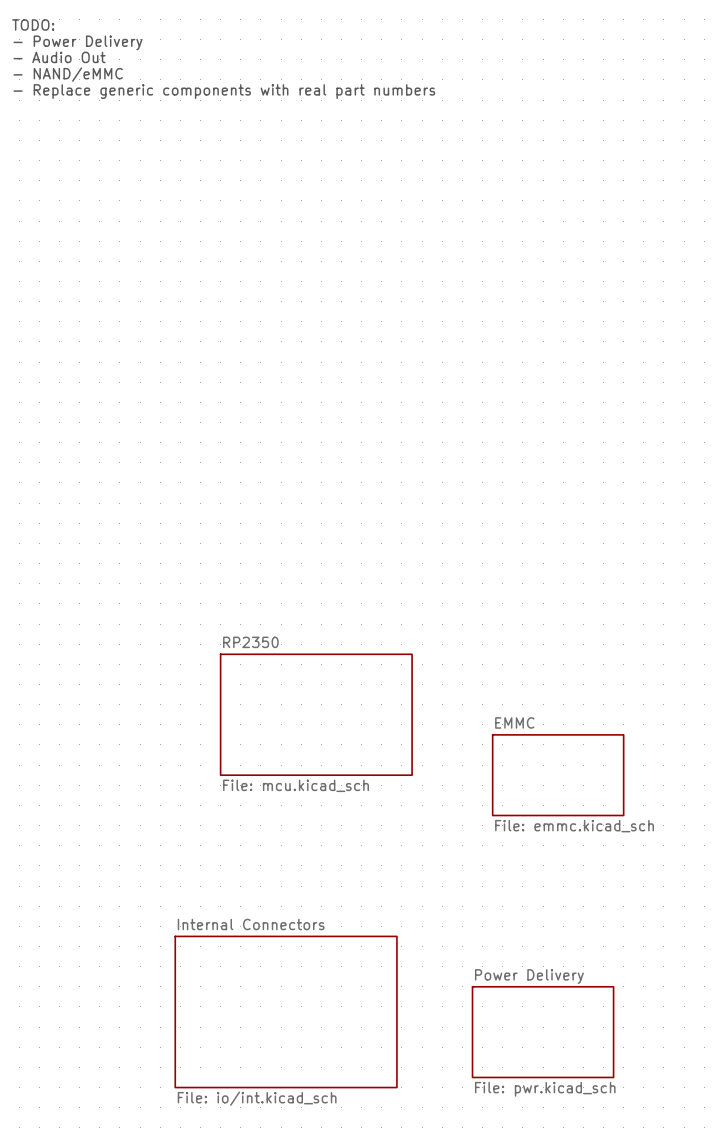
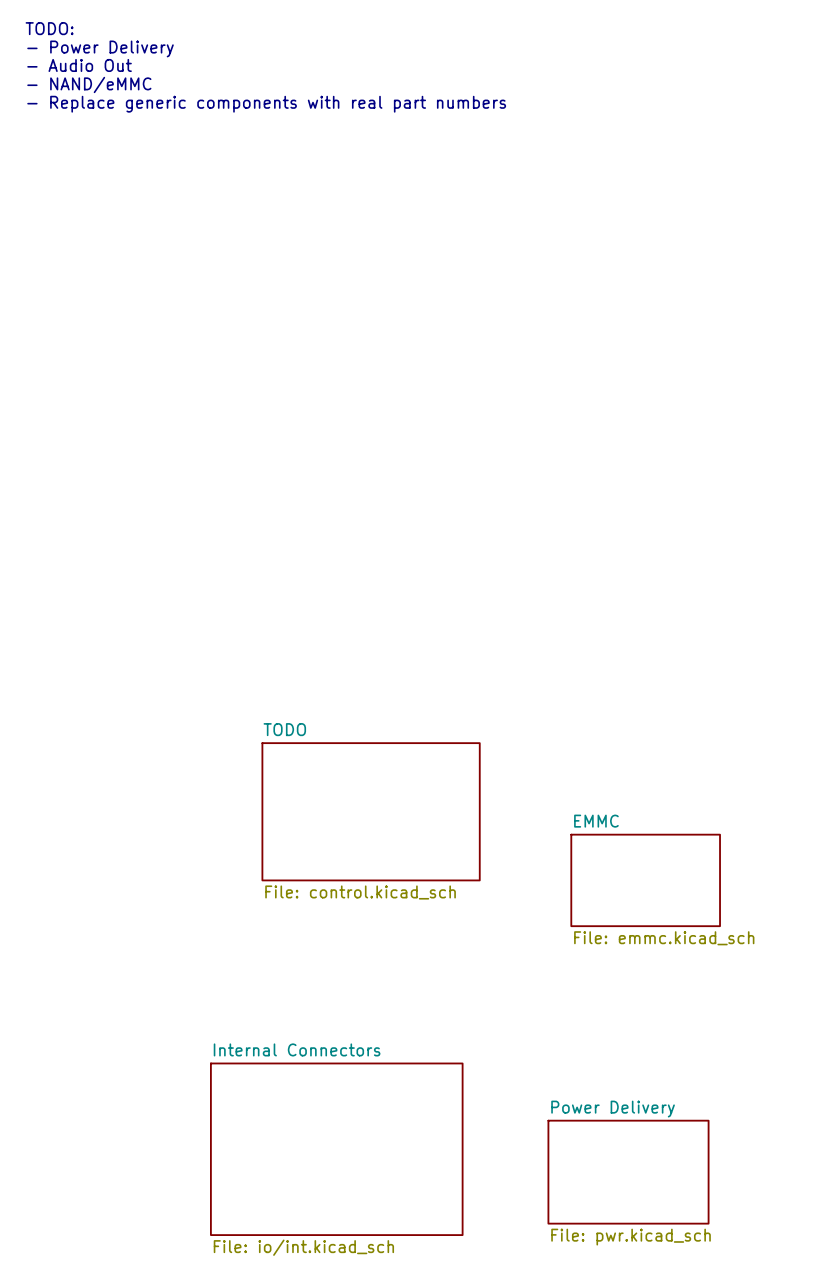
sheet RP2350 name: RP2350 (250, 642) -> TODO (284, 729)
sheet RP2350 value: File: mcu.kicad_sch (296, 785) -> File: control.kicad_sch (360, 892)

